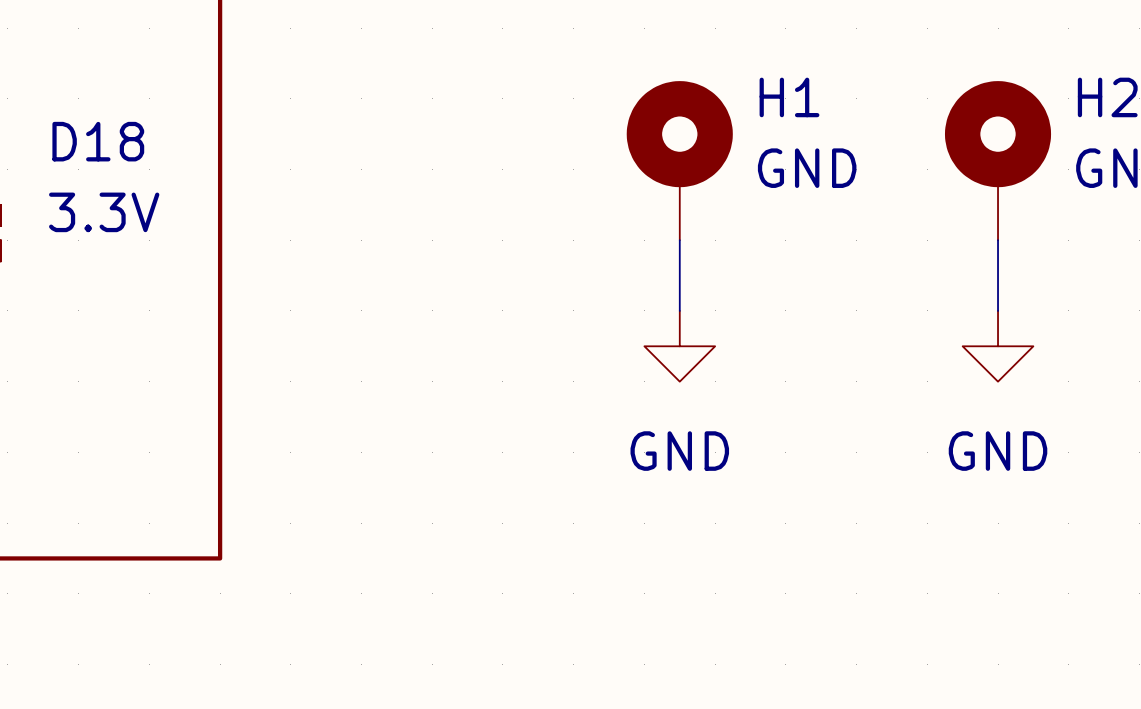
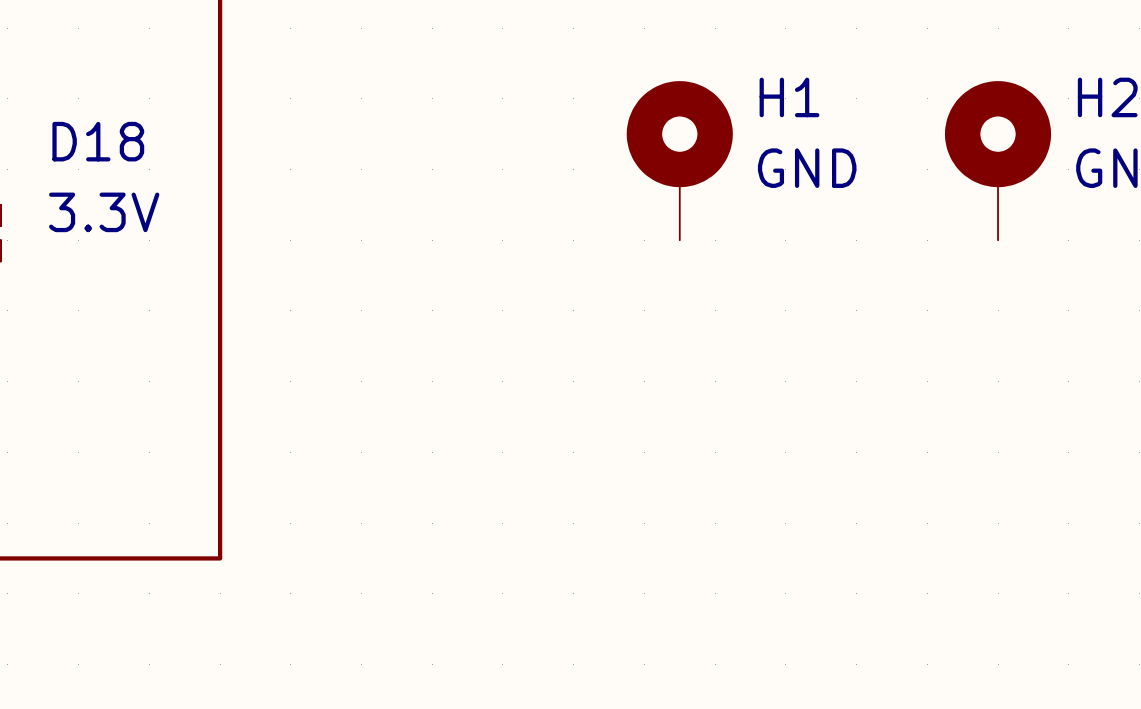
wire: (679, 240) (679, 310) -> none
wire: (998, 240) (998, 310) -> none
power symbol: GND (679, 346) -> none
power symbol: GND (998, 346) -> none

